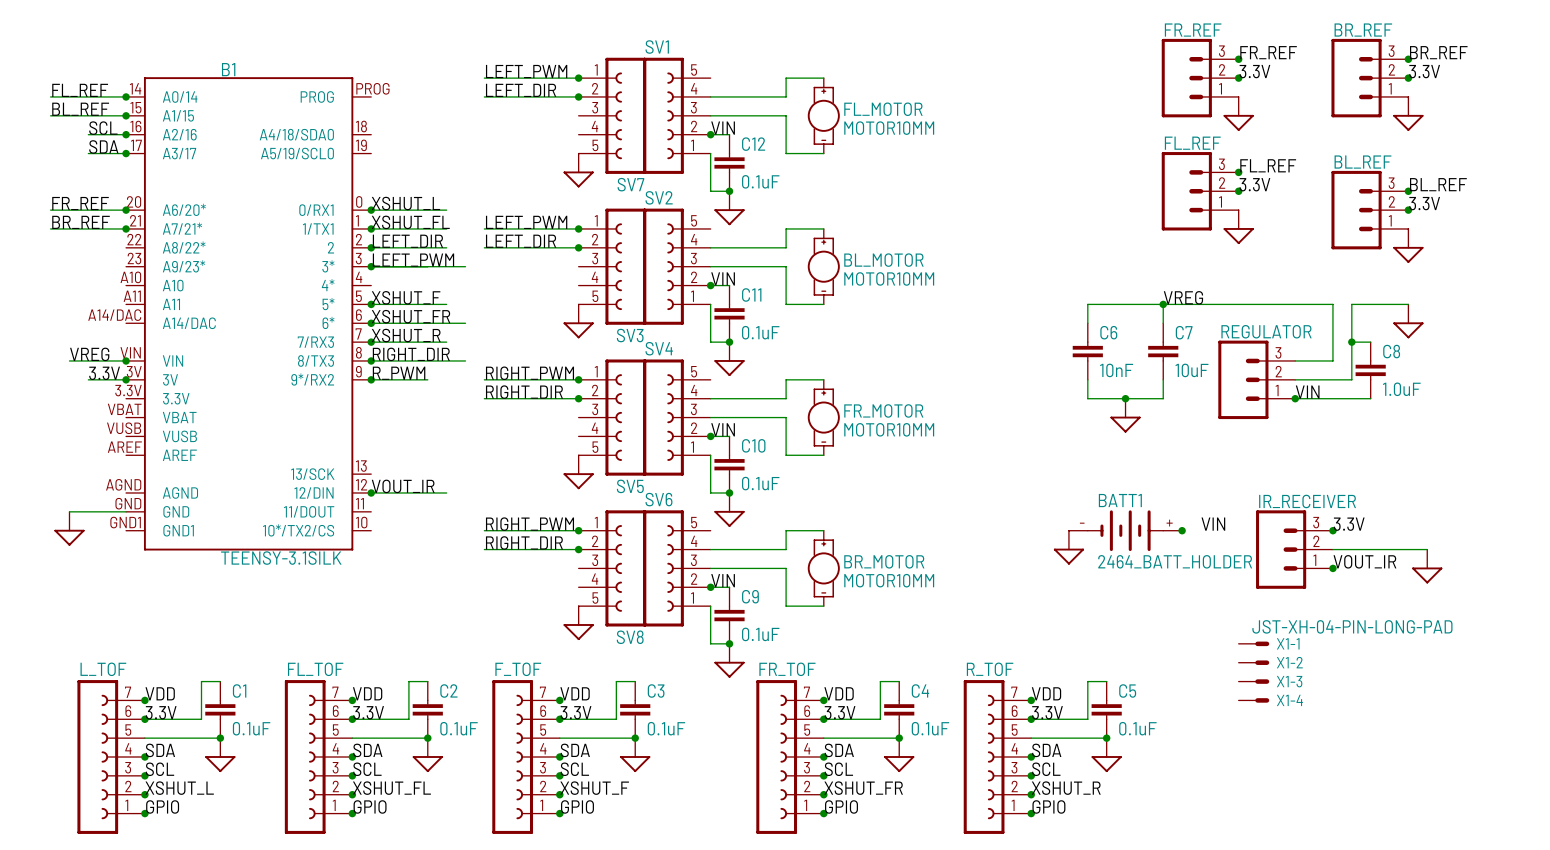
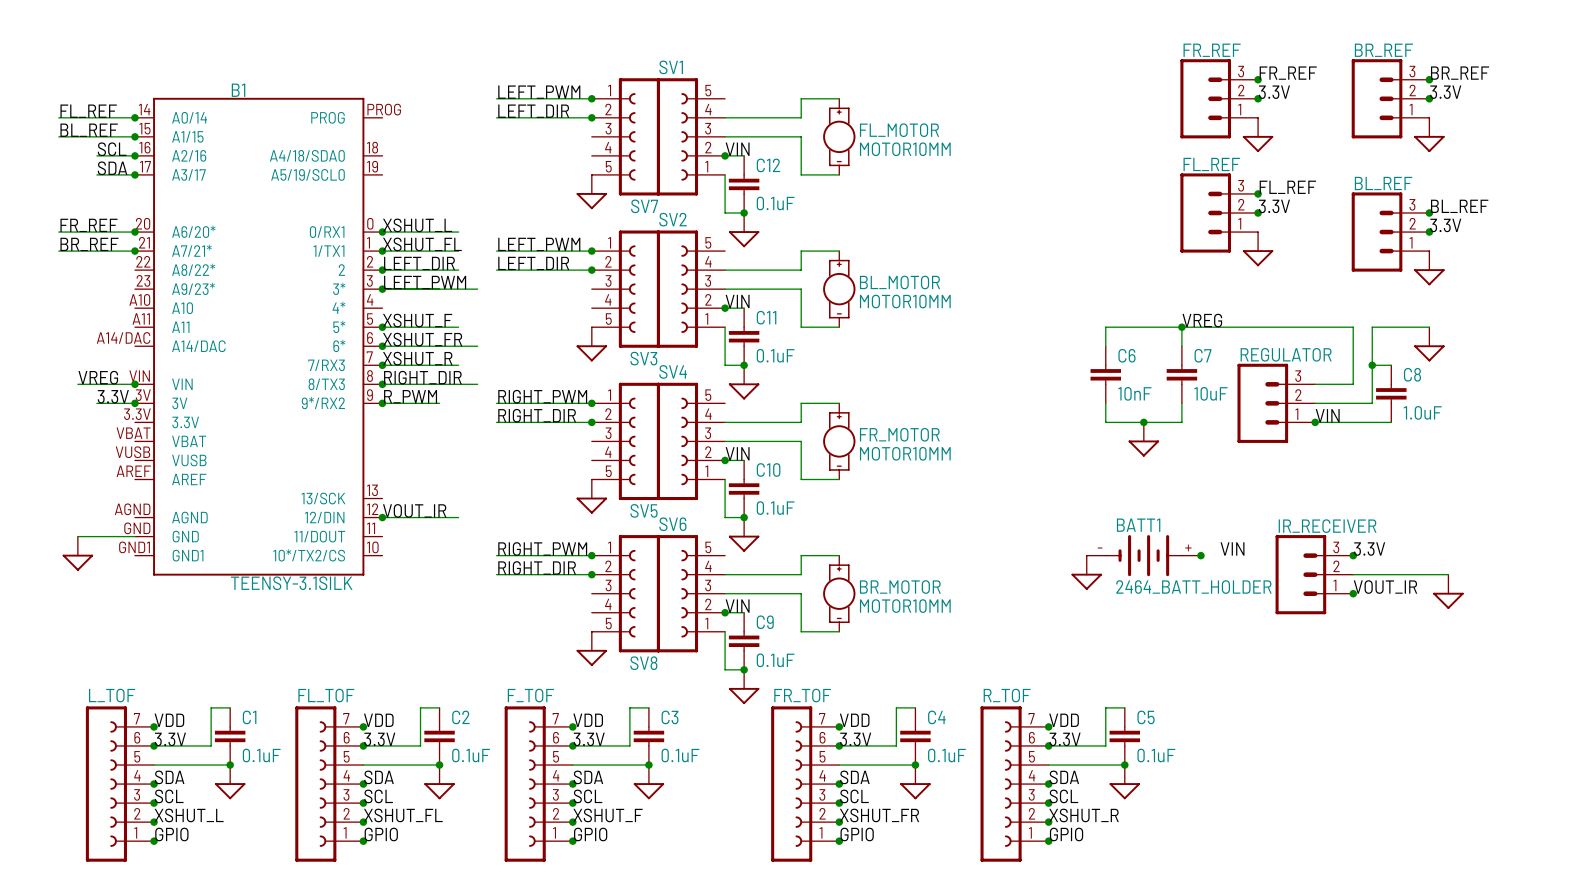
X1-1: JST-XH-04-PIN-LONG-PAD (1253, 643) -> none
X1-2: (1253, 662) -> none
X1-3: (1253, 681) -> none
X1-4: (1253, 700) -> none

